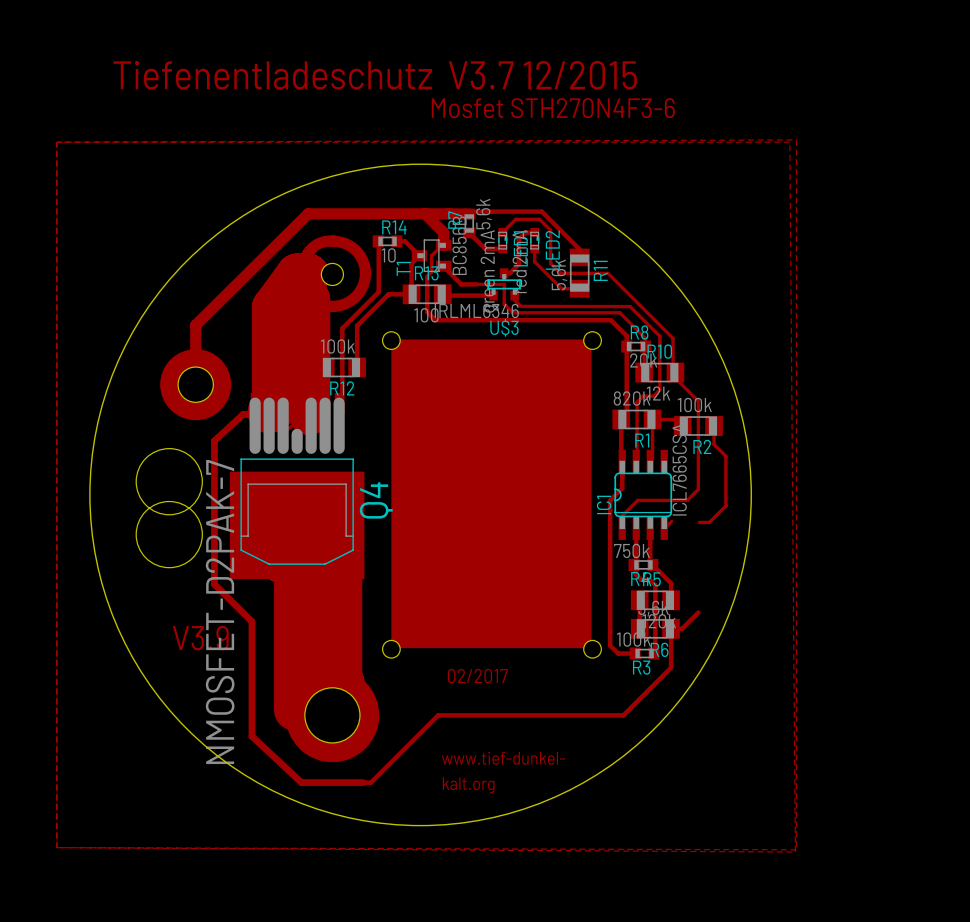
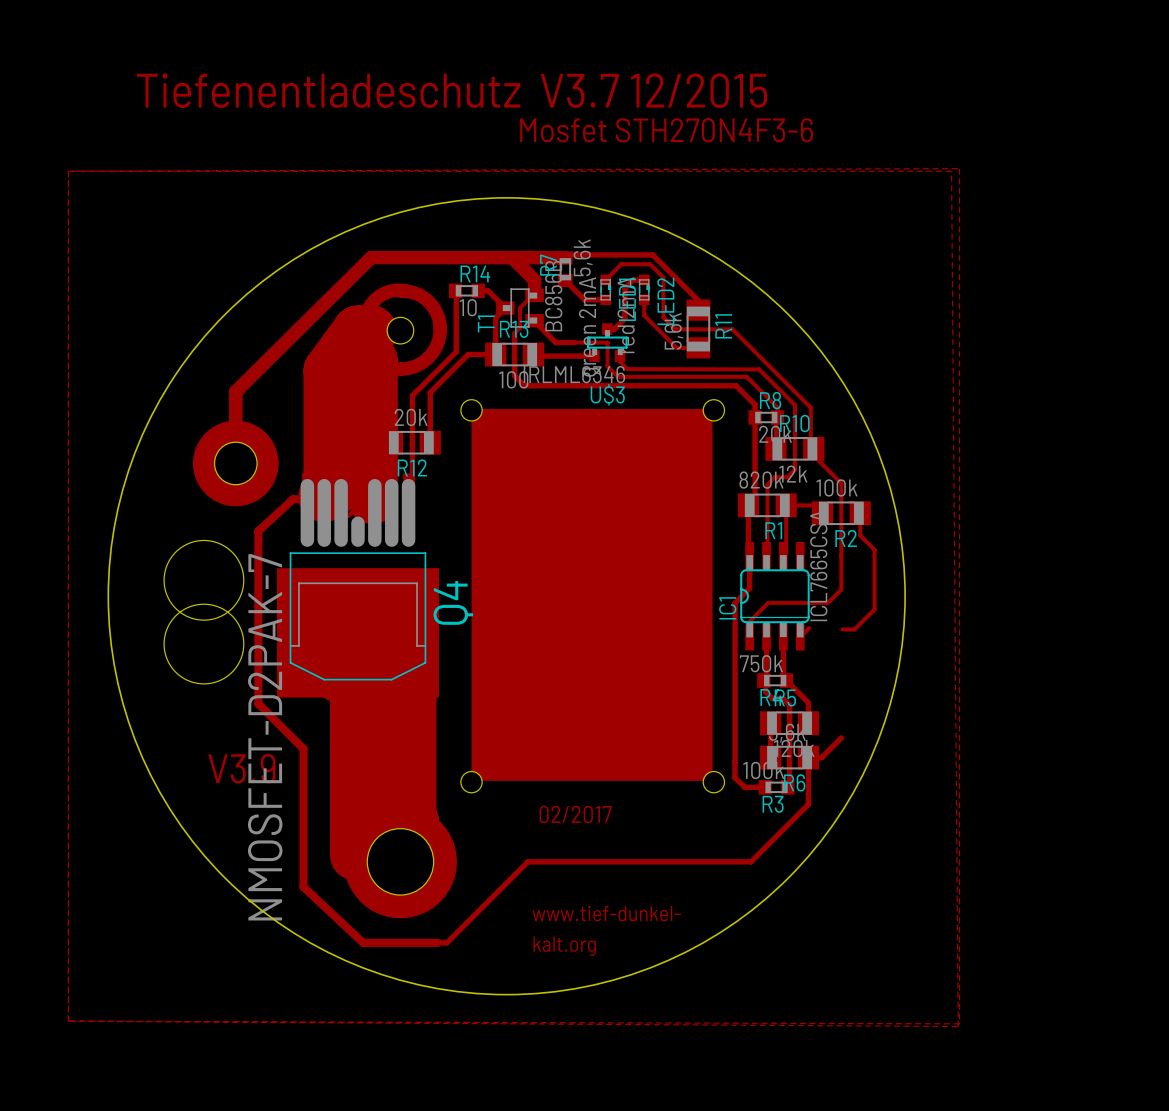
R12 value: 100k (337, 346) -> 20k (411, 417)

